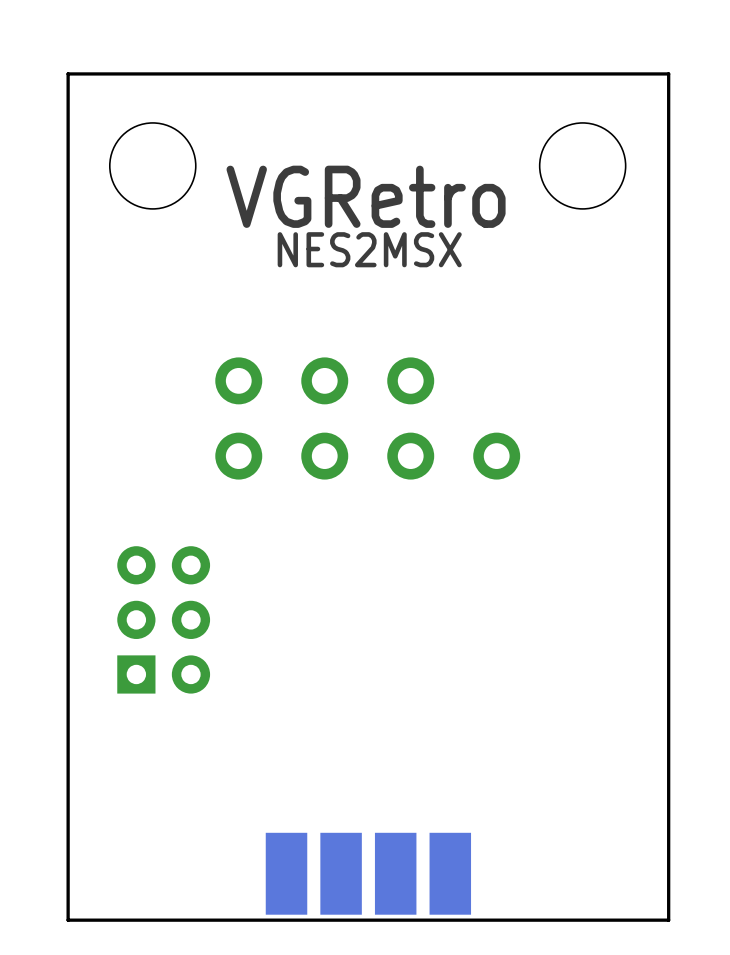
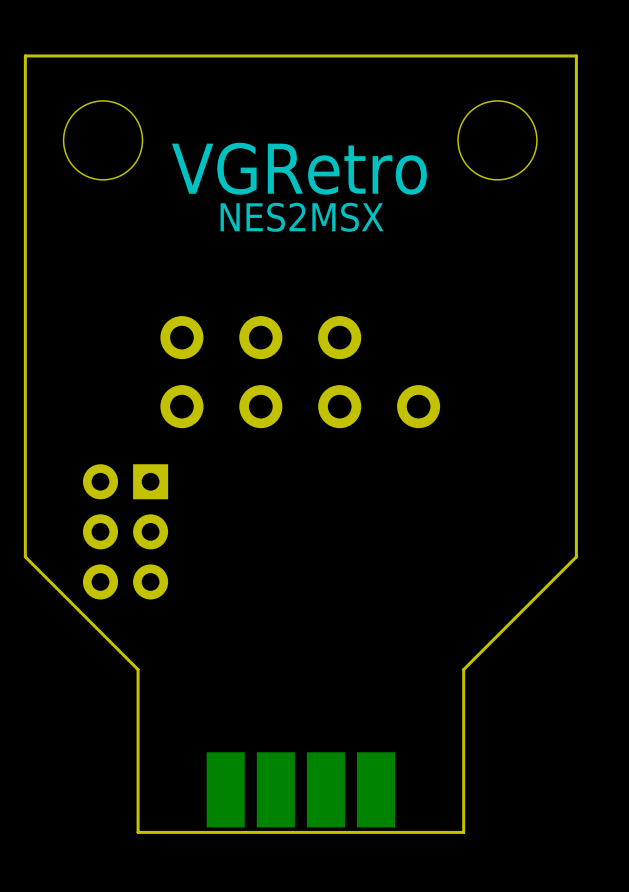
board edge: (68, 619) (68, 920) (190, 920) -> (25, 556) (138, 669) (138, 832)
part rotation: 0° (163, 619) -> 180° (125, 531)
board edge: (668, 619) (668, 920) (545, 920) -> (576, 556) (463, 669) (463, 832)

